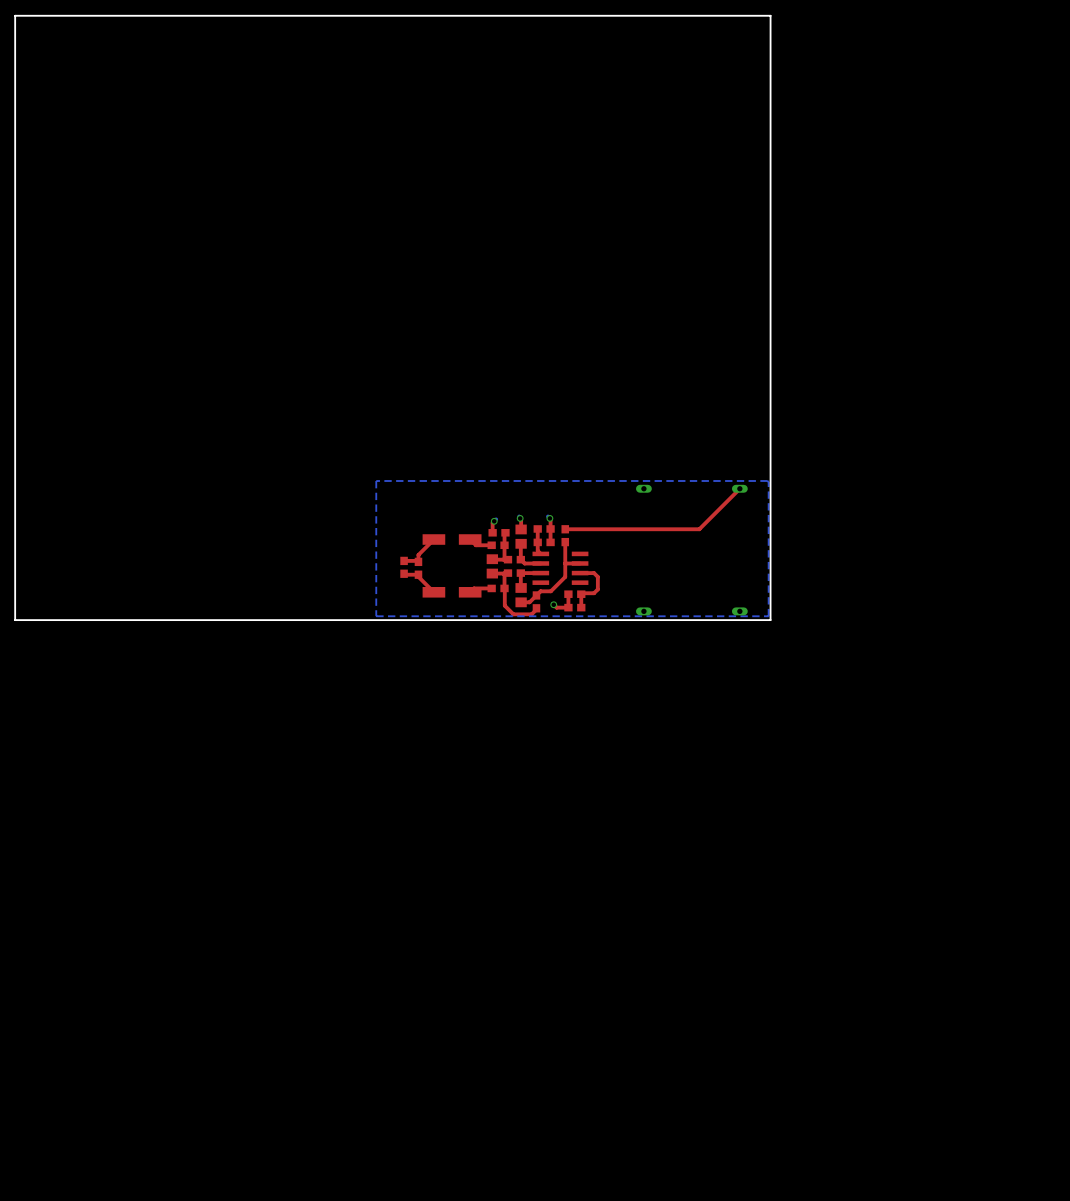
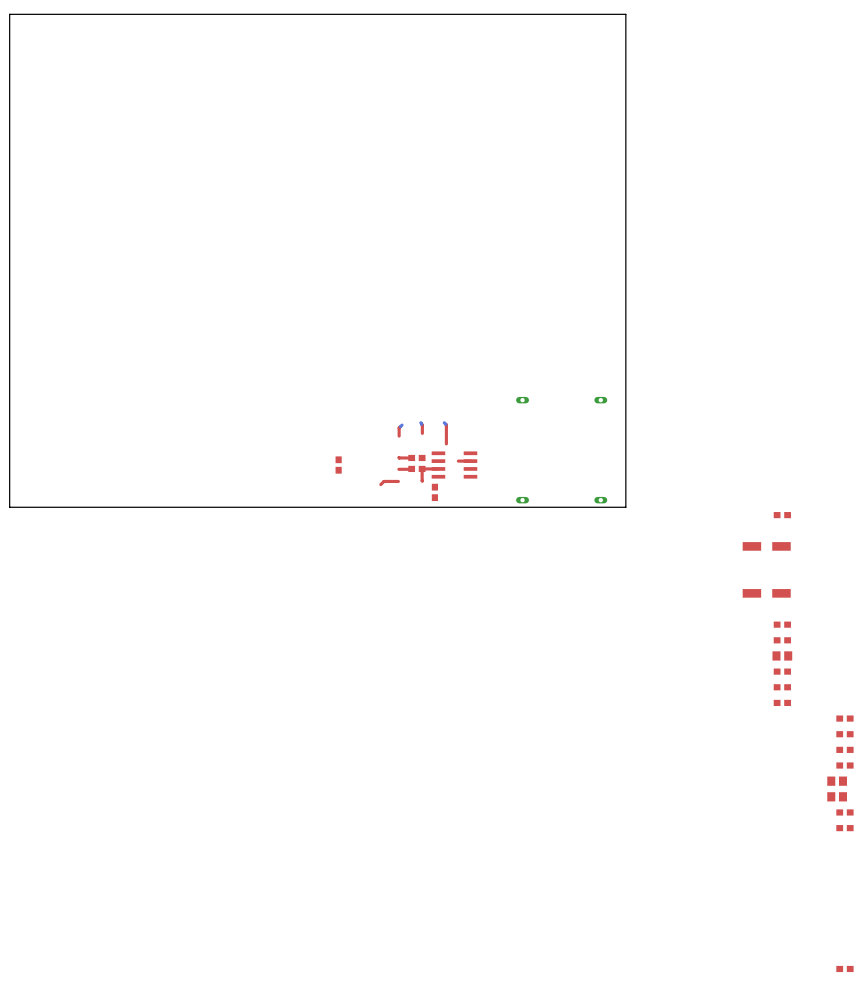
bottom zone outline: (767, 480) (376, 480) (376, 616) (768, 616) (767, 480) -> none
top track: (739, 488) (699, 529) (565, 529) -> none
via: (520, 518) -> none
via: (549, 518) -> none
via: (494, 521) -> none
top track: (537, 528) (537, 550) (540, 553) -> none
part: (544, 528) -> none
part: (499, 532) -> none
top track: (505, 532) (503, 559) -> none
part: (565, 535) -> none
part: (521, 536) -> none
top track: (433, 539) (418, 554) (418, 561) (404, 560) -> none
part: (452, 539) -> none
top track: (470, 539) (475, 545) (491, 545) -> none
part: (544, 542) -> none
top track: (565, 542) (565, 576) (550, 591) (540, 591) (529, 602) (521, 602) -> none
top track: (521, 543) (520, 559) (524, 563) (540, 563) -> none
part: (498, 545) -> none
part: (492, 566) -> none
part: (404, 567) -> none
top track: (404, 573) (418, 574) (433, 592) -> none
top track: (503, 573) (504, 605) (513, 614) (531, 614) (536, 608) -> none
top track: (580, 573) (594, 573) (597, 576) (597, 589) (594, 593) (581, 594) (581, 607) -> none
part: (498, 588) -> none
part: (452, 592) -> none
top track: (568, 594) (568, 607) (556, 607) (553, 604) -> none
part: (574, 594) -> none
part: (521, 595) -> none
via: (553, 604) -> none
part: (574, 607) -> none
part: none -> (782, 515)
part: none -> (766, 546)
part: none -> (766, 593)
part: none -> (782, 624)
part: none -> (782, 640)
part: none -> (782, 655)
part: none -> (782, 671)
part: none -> (782, 687)
part: none -> (782, 702)
part: none -> (844, 718)
part: none -> (844, 734)
part: none -> (844, 749)
part: none -> (844, 765)
part: none -> (837, 781)
part: none -> (837, 796)
part: none -> (844, 812)
part: none -> (844, 828)
part: none -> (844, 968)

